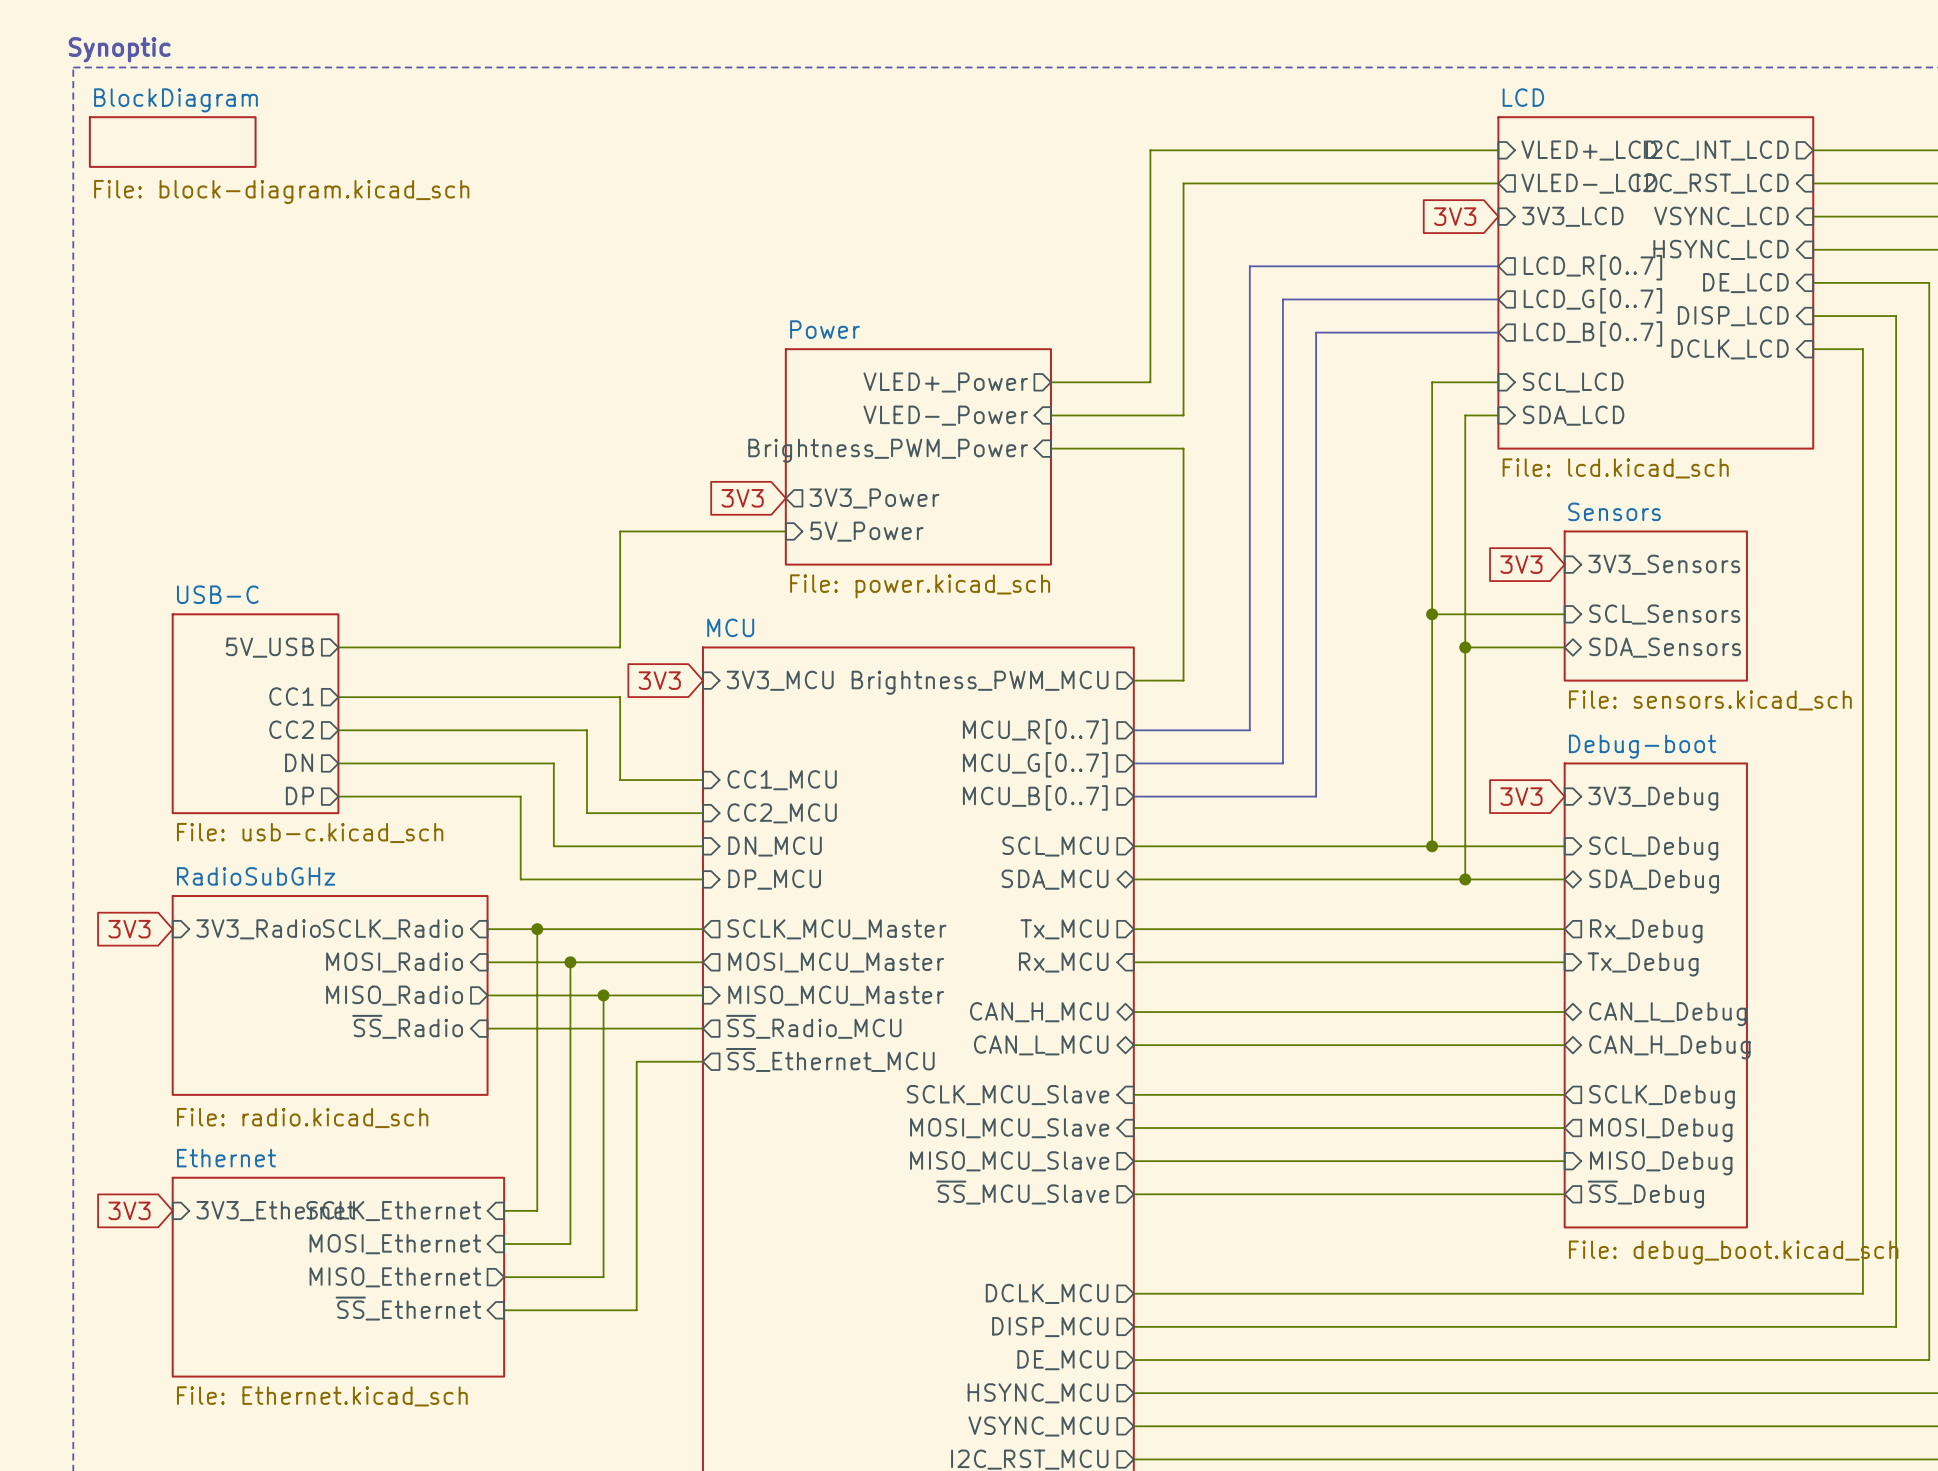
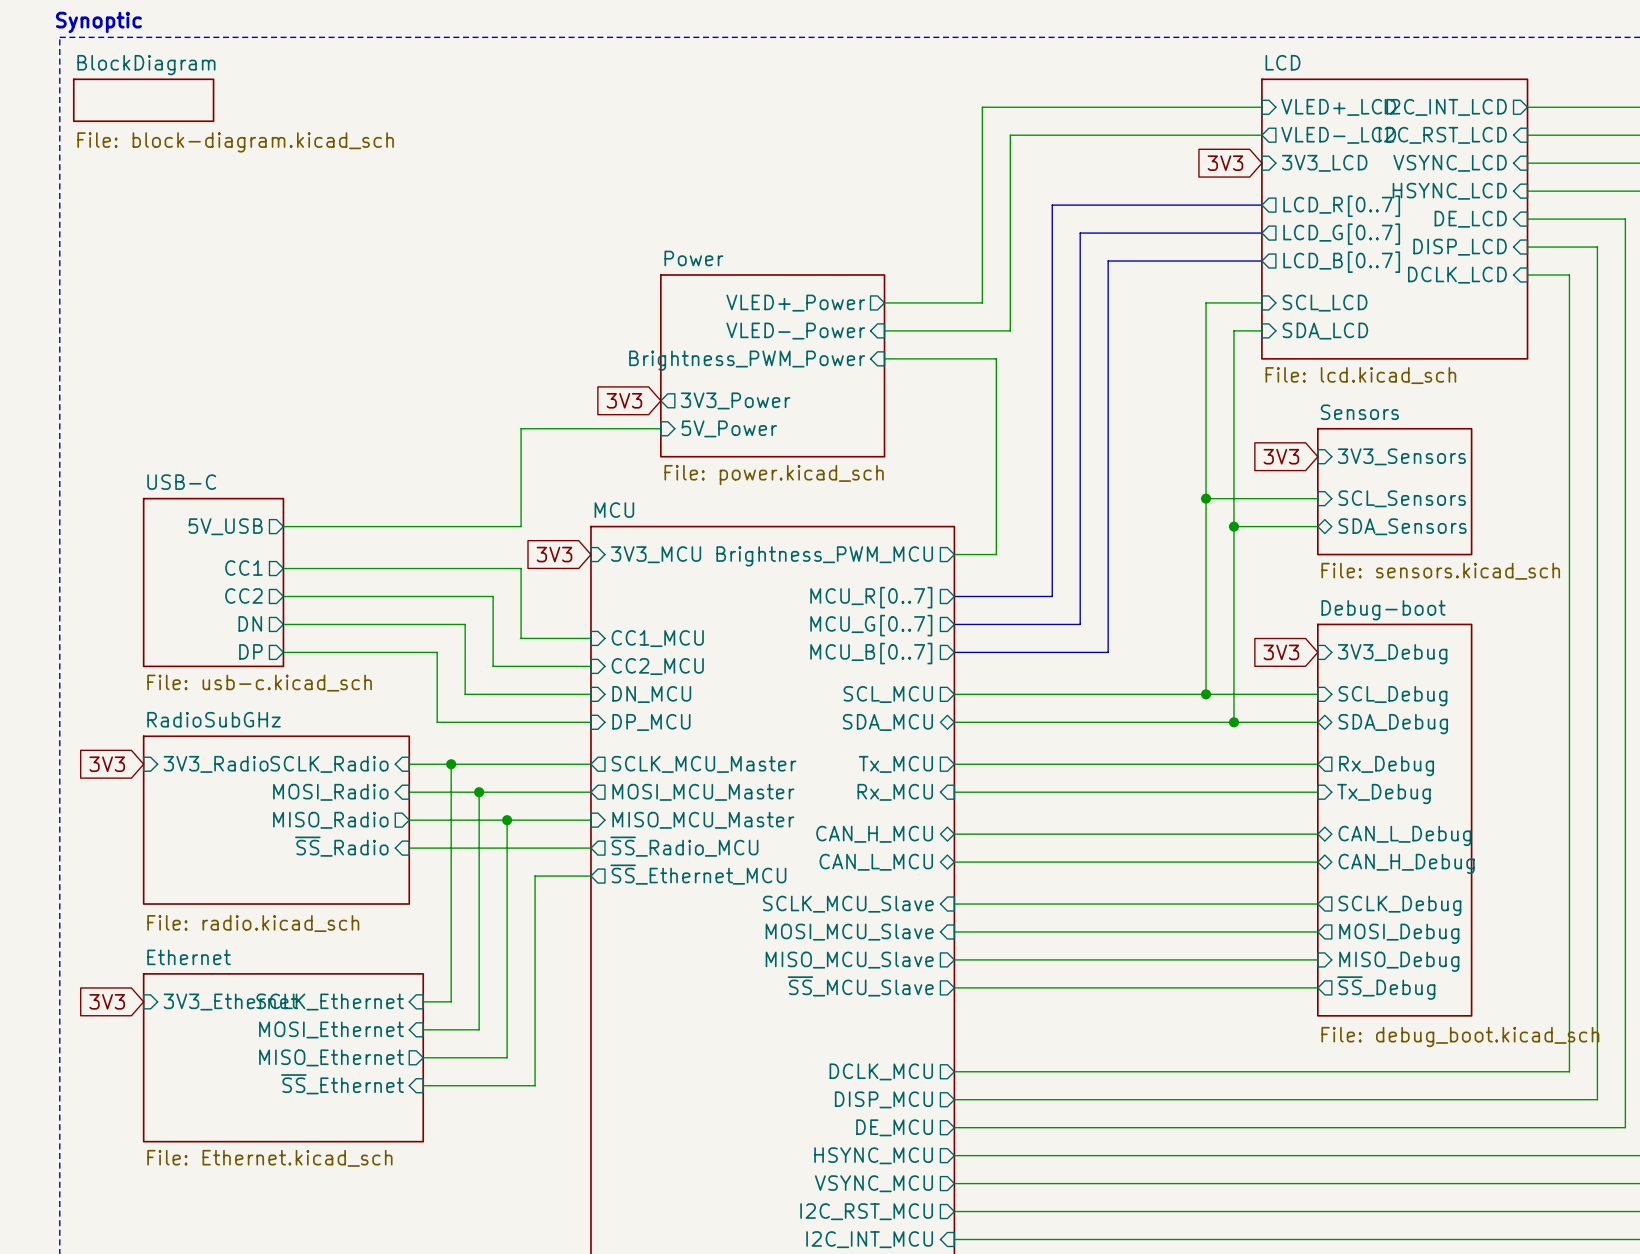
wire: (1166, 150) (1150, 150) (1150, 382) -> (982, 107) (982, 302) (968, 302)
wire: (1200, 183) (1183, 183) (1183, 415) -> (1010, 135) (1010, 330) (996, 330)

